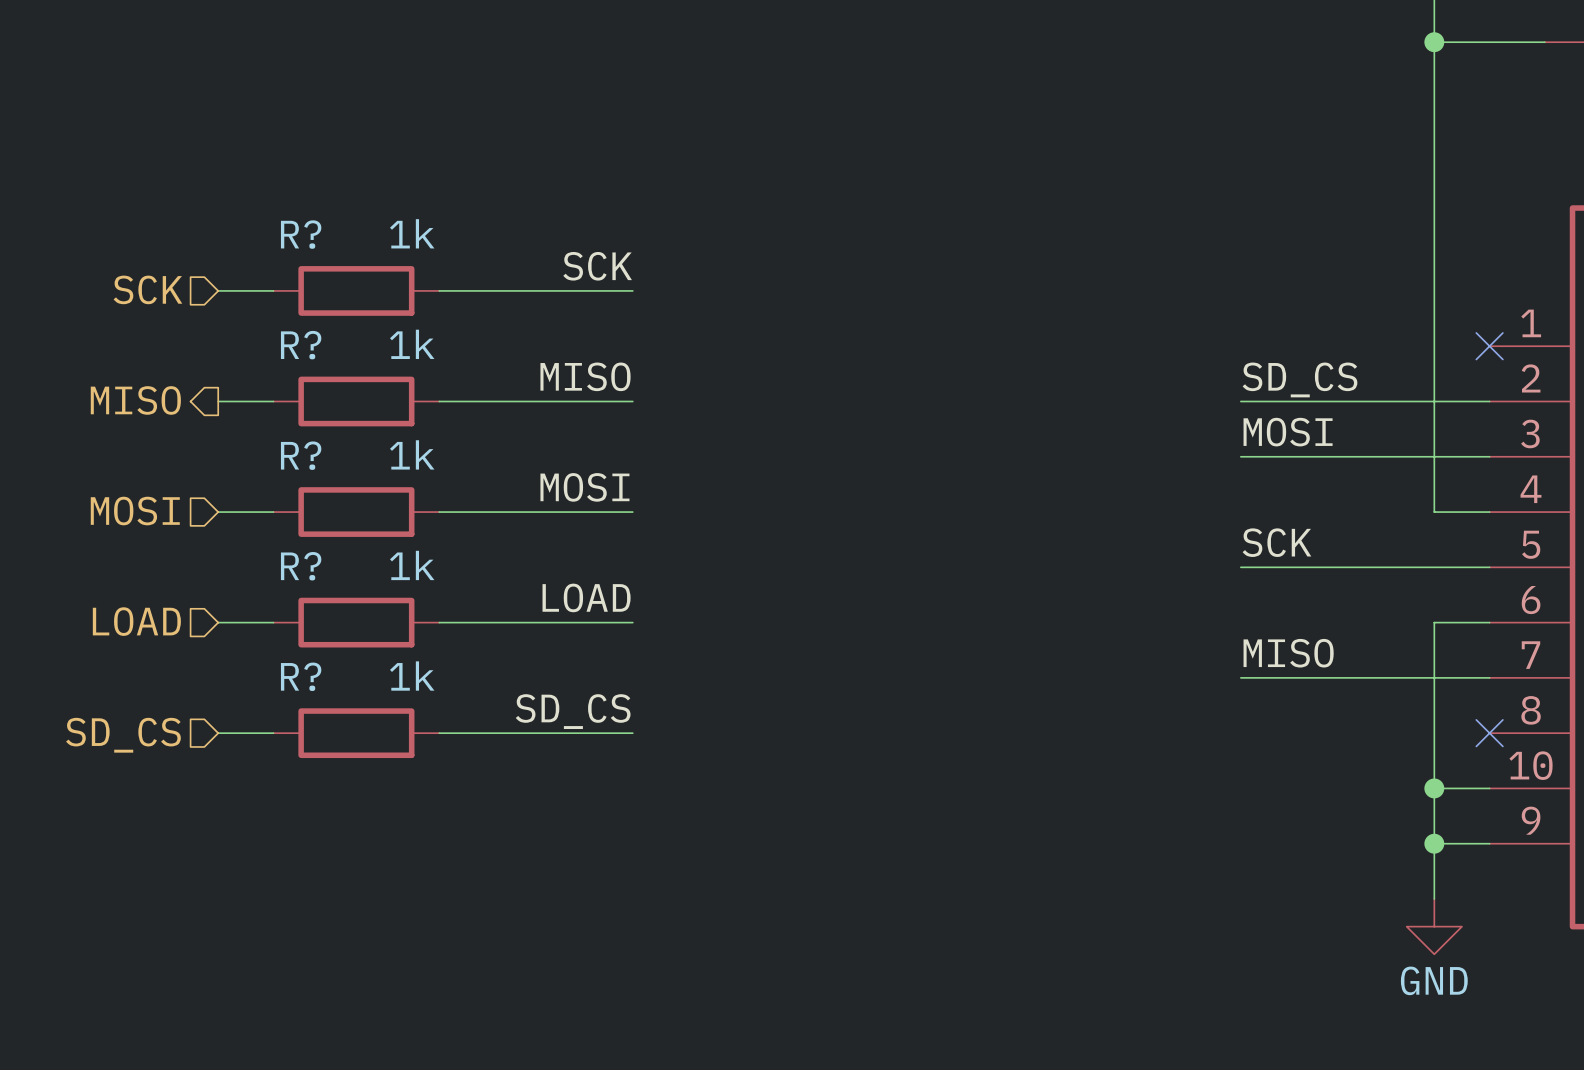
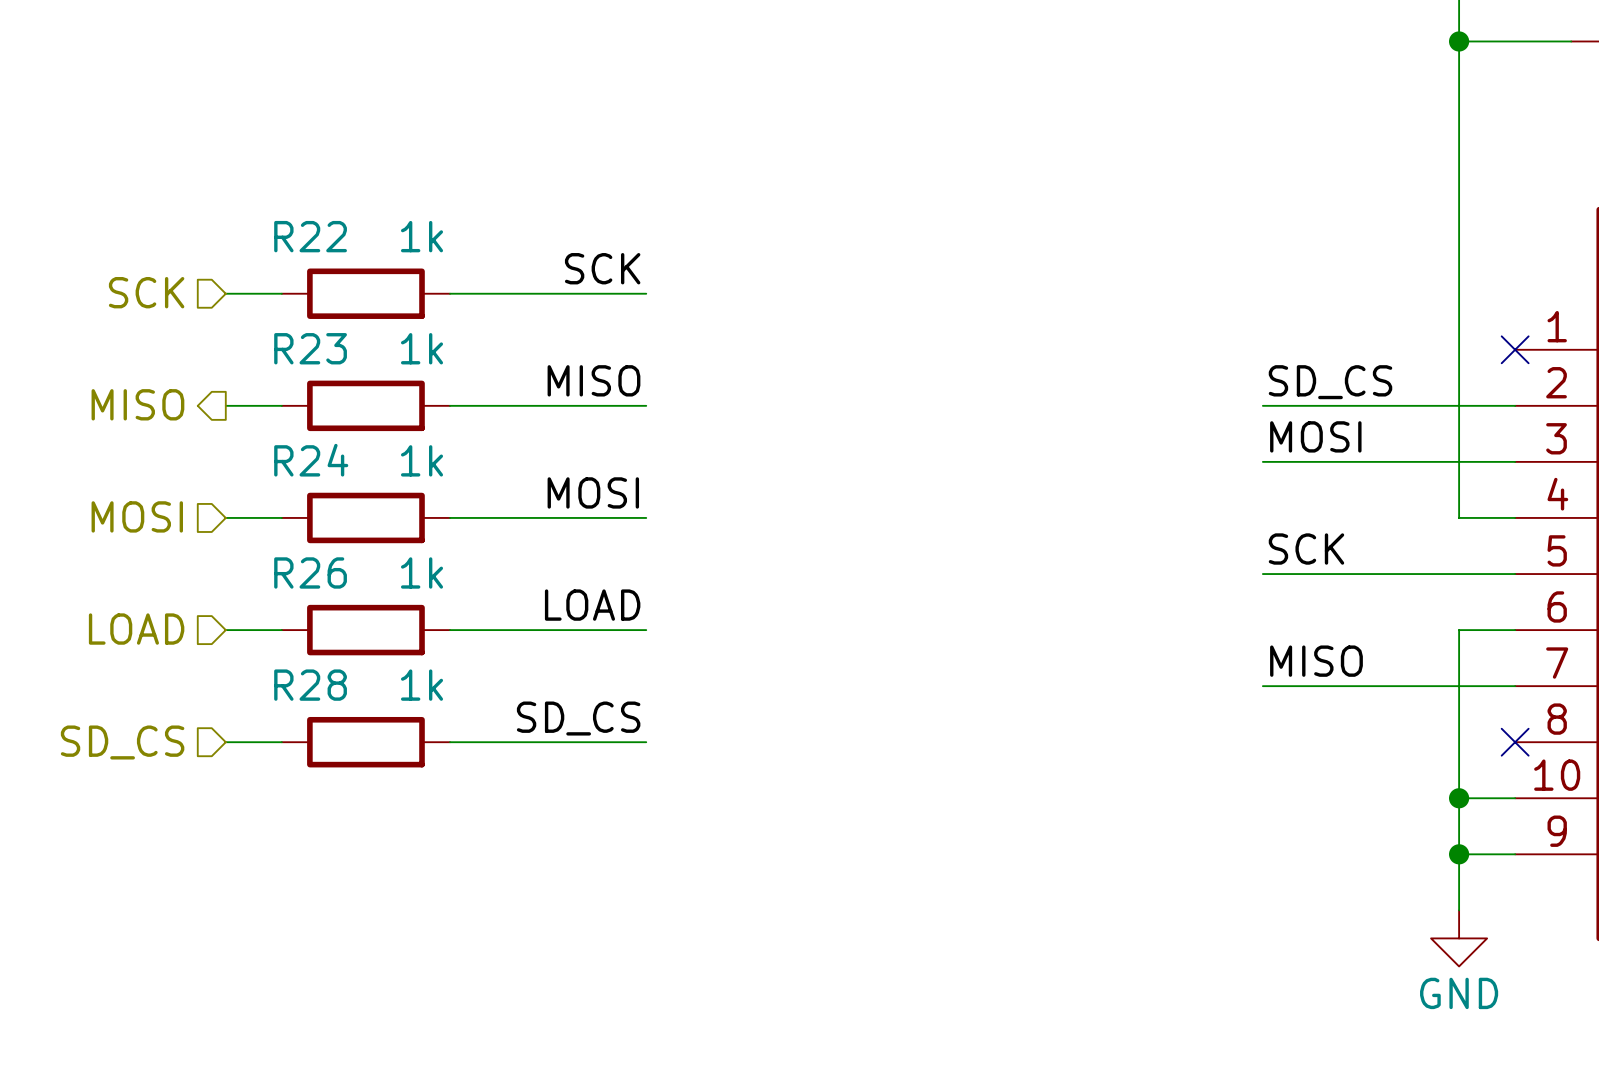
R? name: R? (301, 234) -> R22 (310, 236)
R? name: R? (301, 345) -> R23 (310, 348)
R? name: R? (301, 455) -> R24 (311, 460)
R? name: R? (301, 566) -> R26 (310, 572)
R? name: R? (301, 676) -> R28 (310, 685)

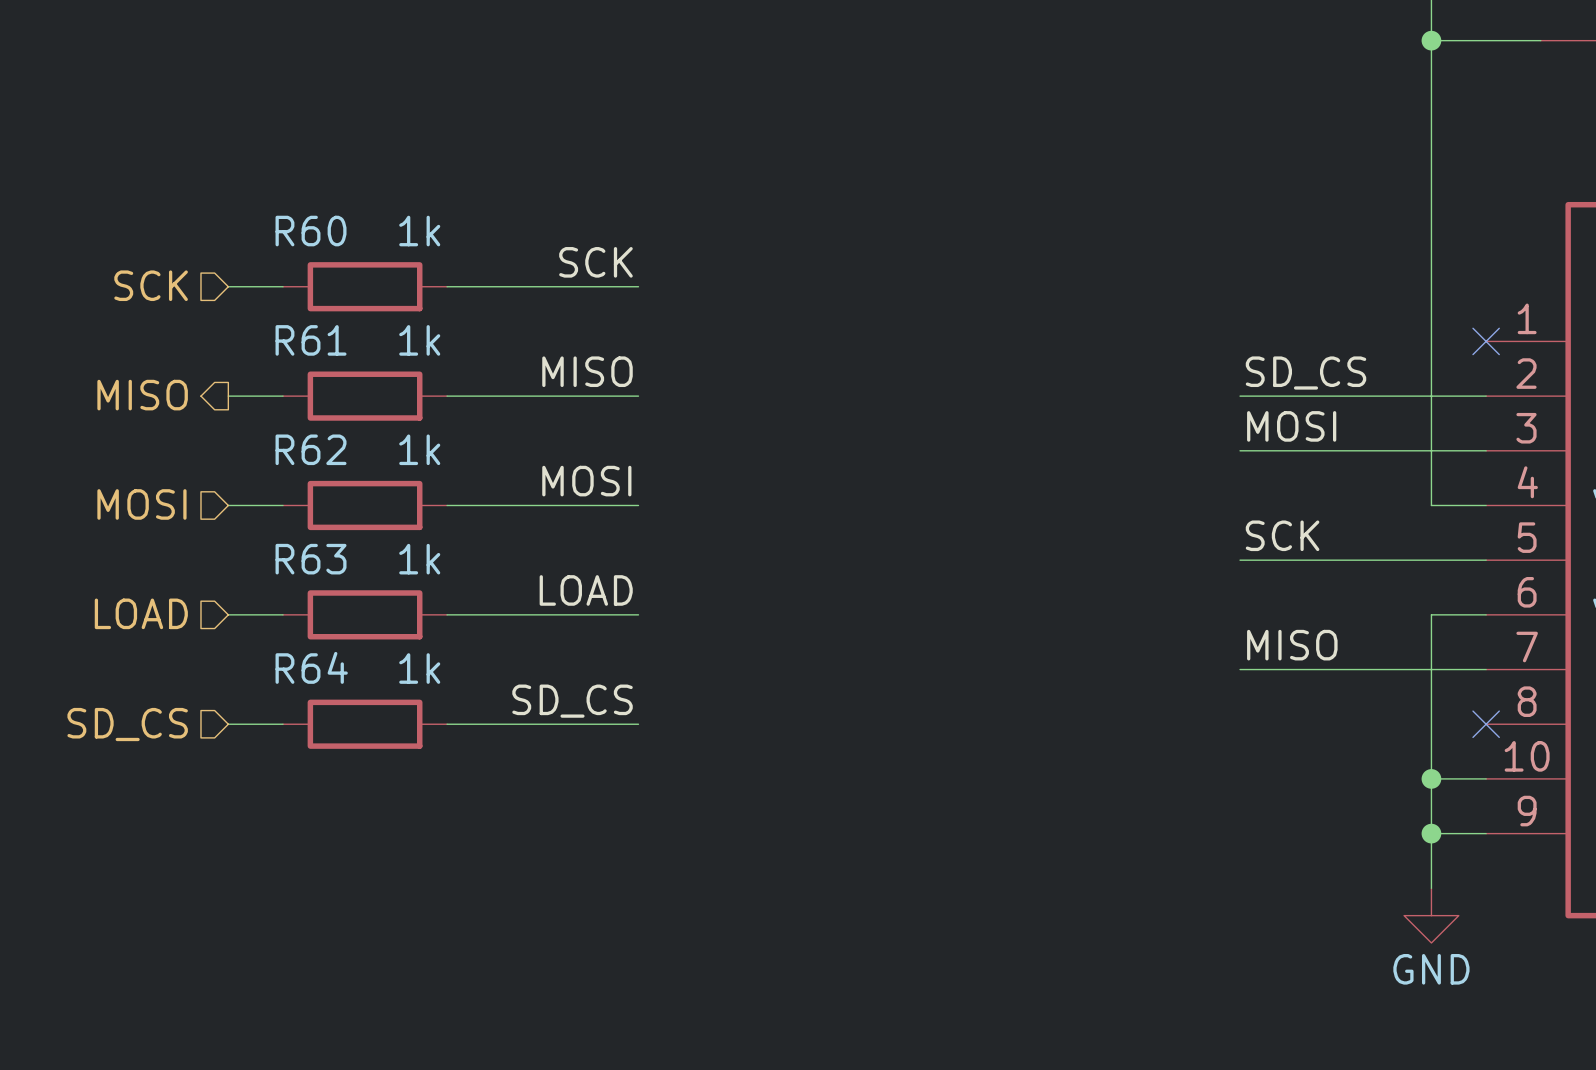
R22 name: R22 (310, 236) -> R60 (311, 231)
R23 name: R23 (310, 348) -> R61 (311, 340)
R24 name: R24 (311, 460) -> R62 (311, 449)
R26 name: R26 (310, 572) -> R63 (311, 559)
R28 name: R28 (310, 685) -> R64 (311, 667)

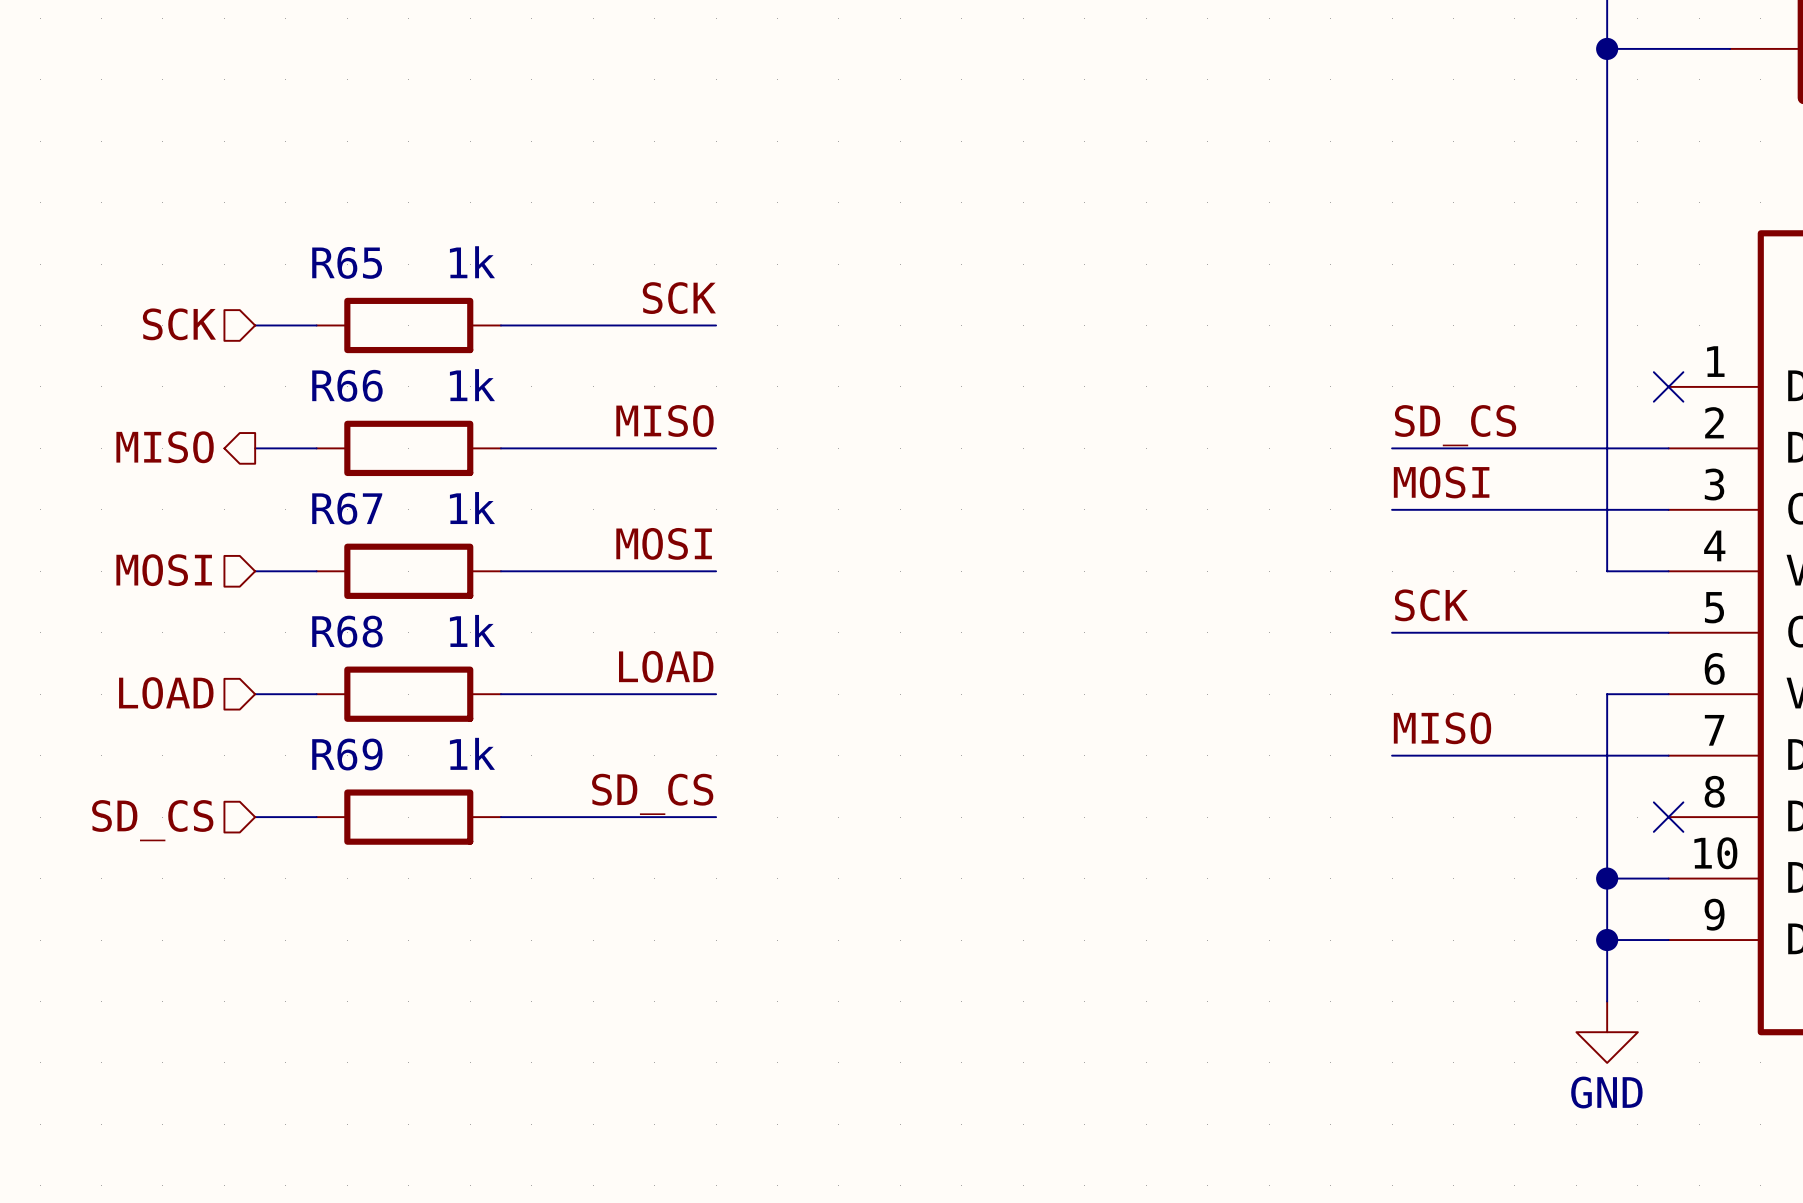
R60 name: R60 (311, 231) -> R65 (347, 262)
R61 name: R61 (311, 340) -> R66 (347, 385)
R62 name: R62 (311, 449) -> R67 (347, 508)
R63 name: R63 (311, 559) -> R68 (347, 631)
R64 name: R64 (311, 667) -> R69 (347, 754)

